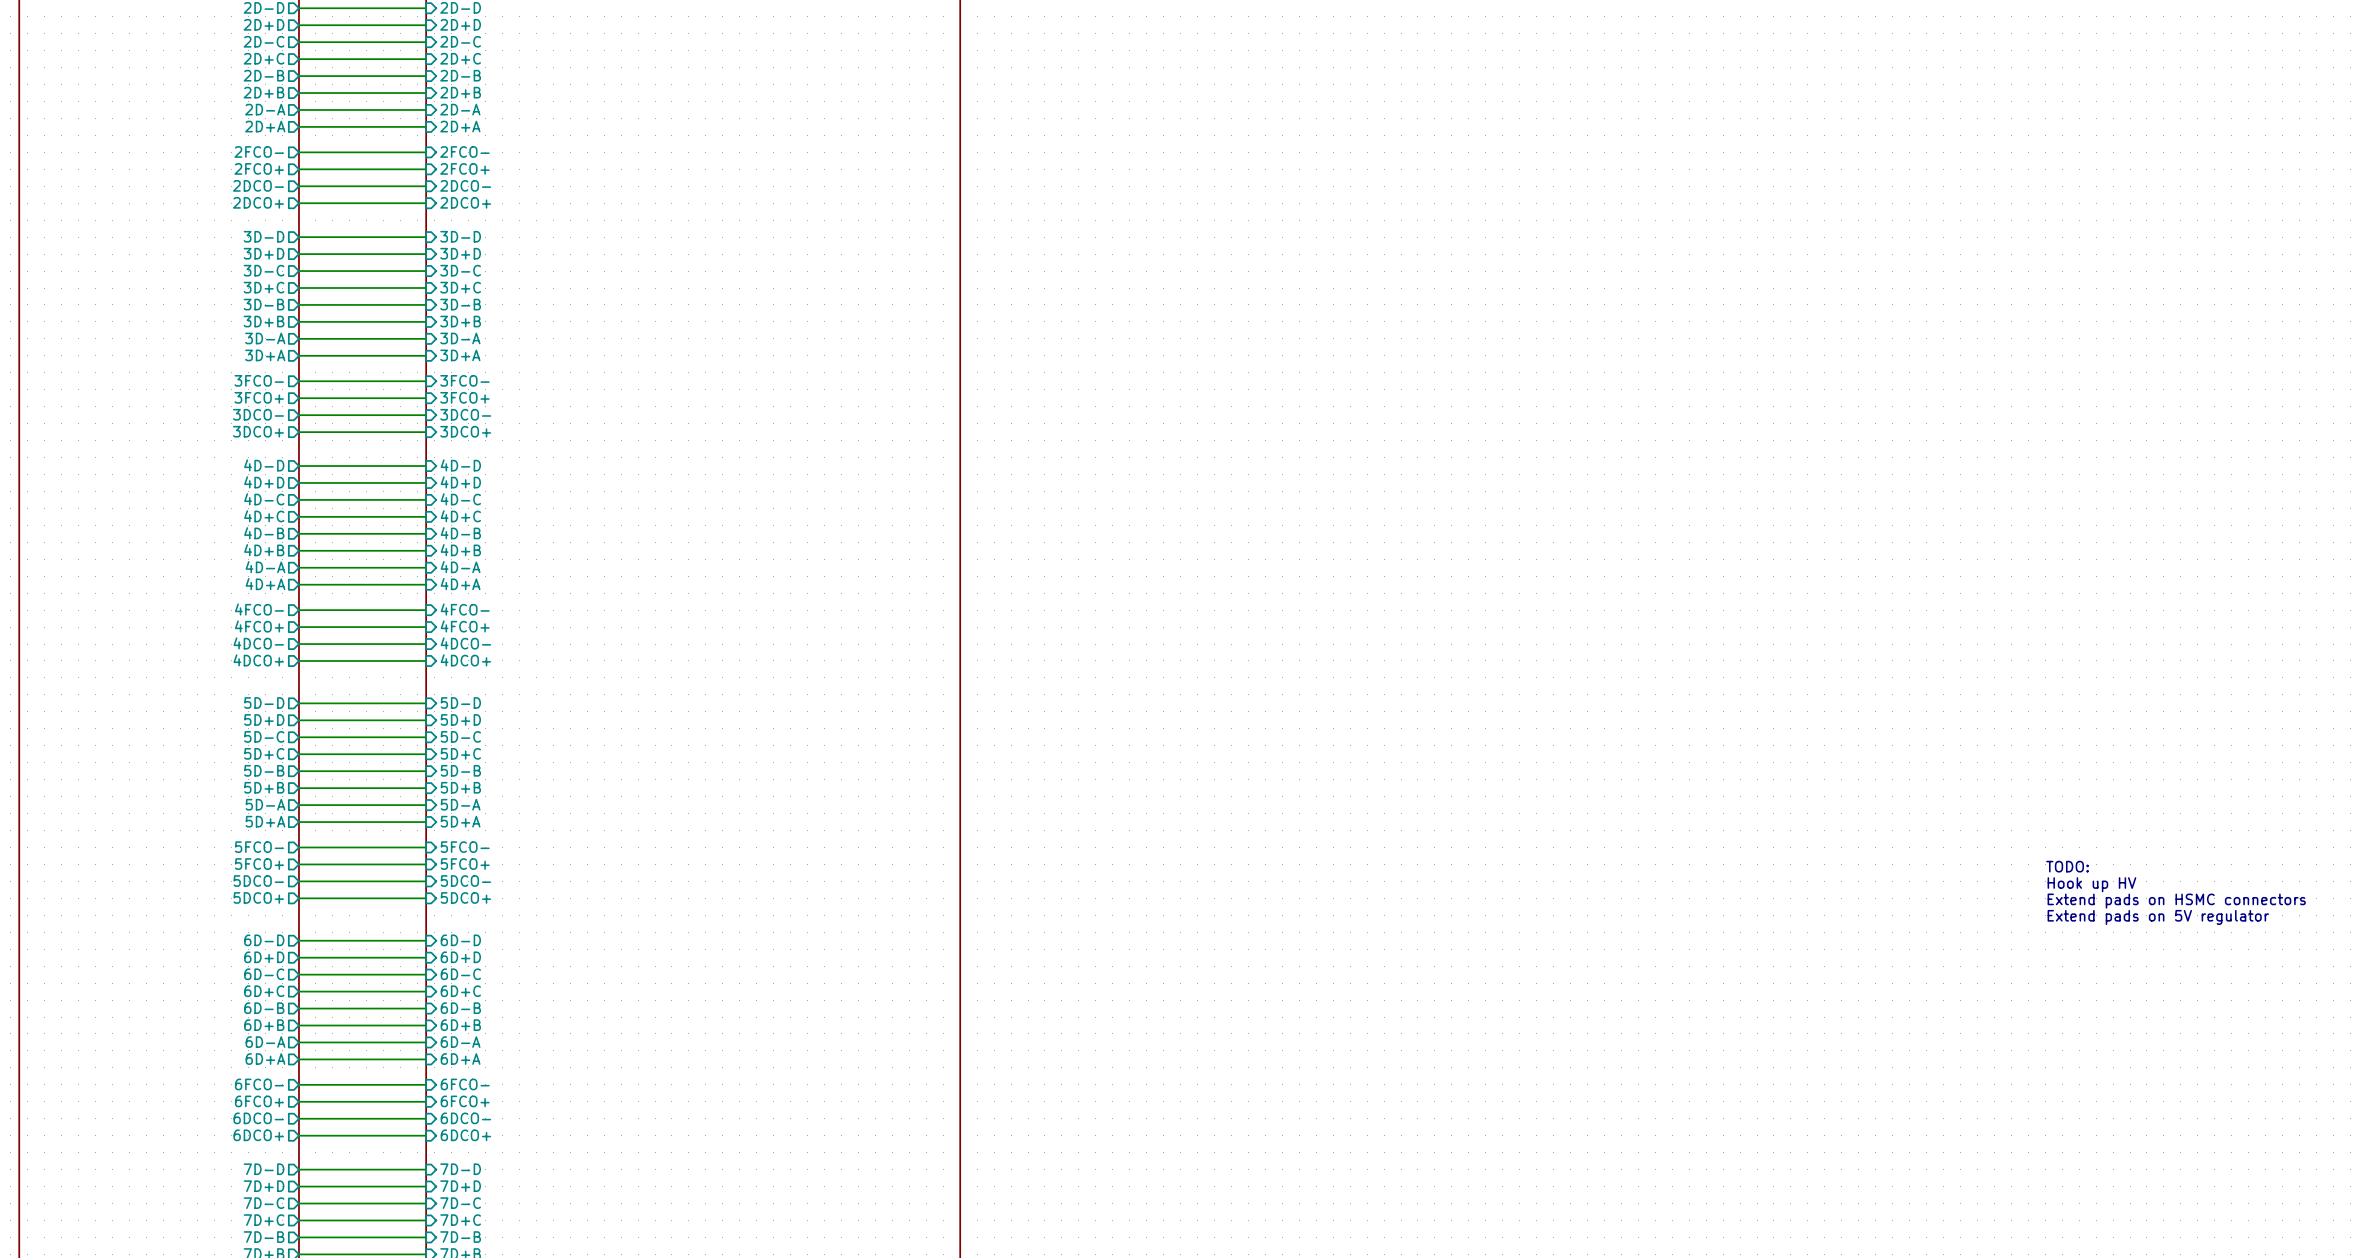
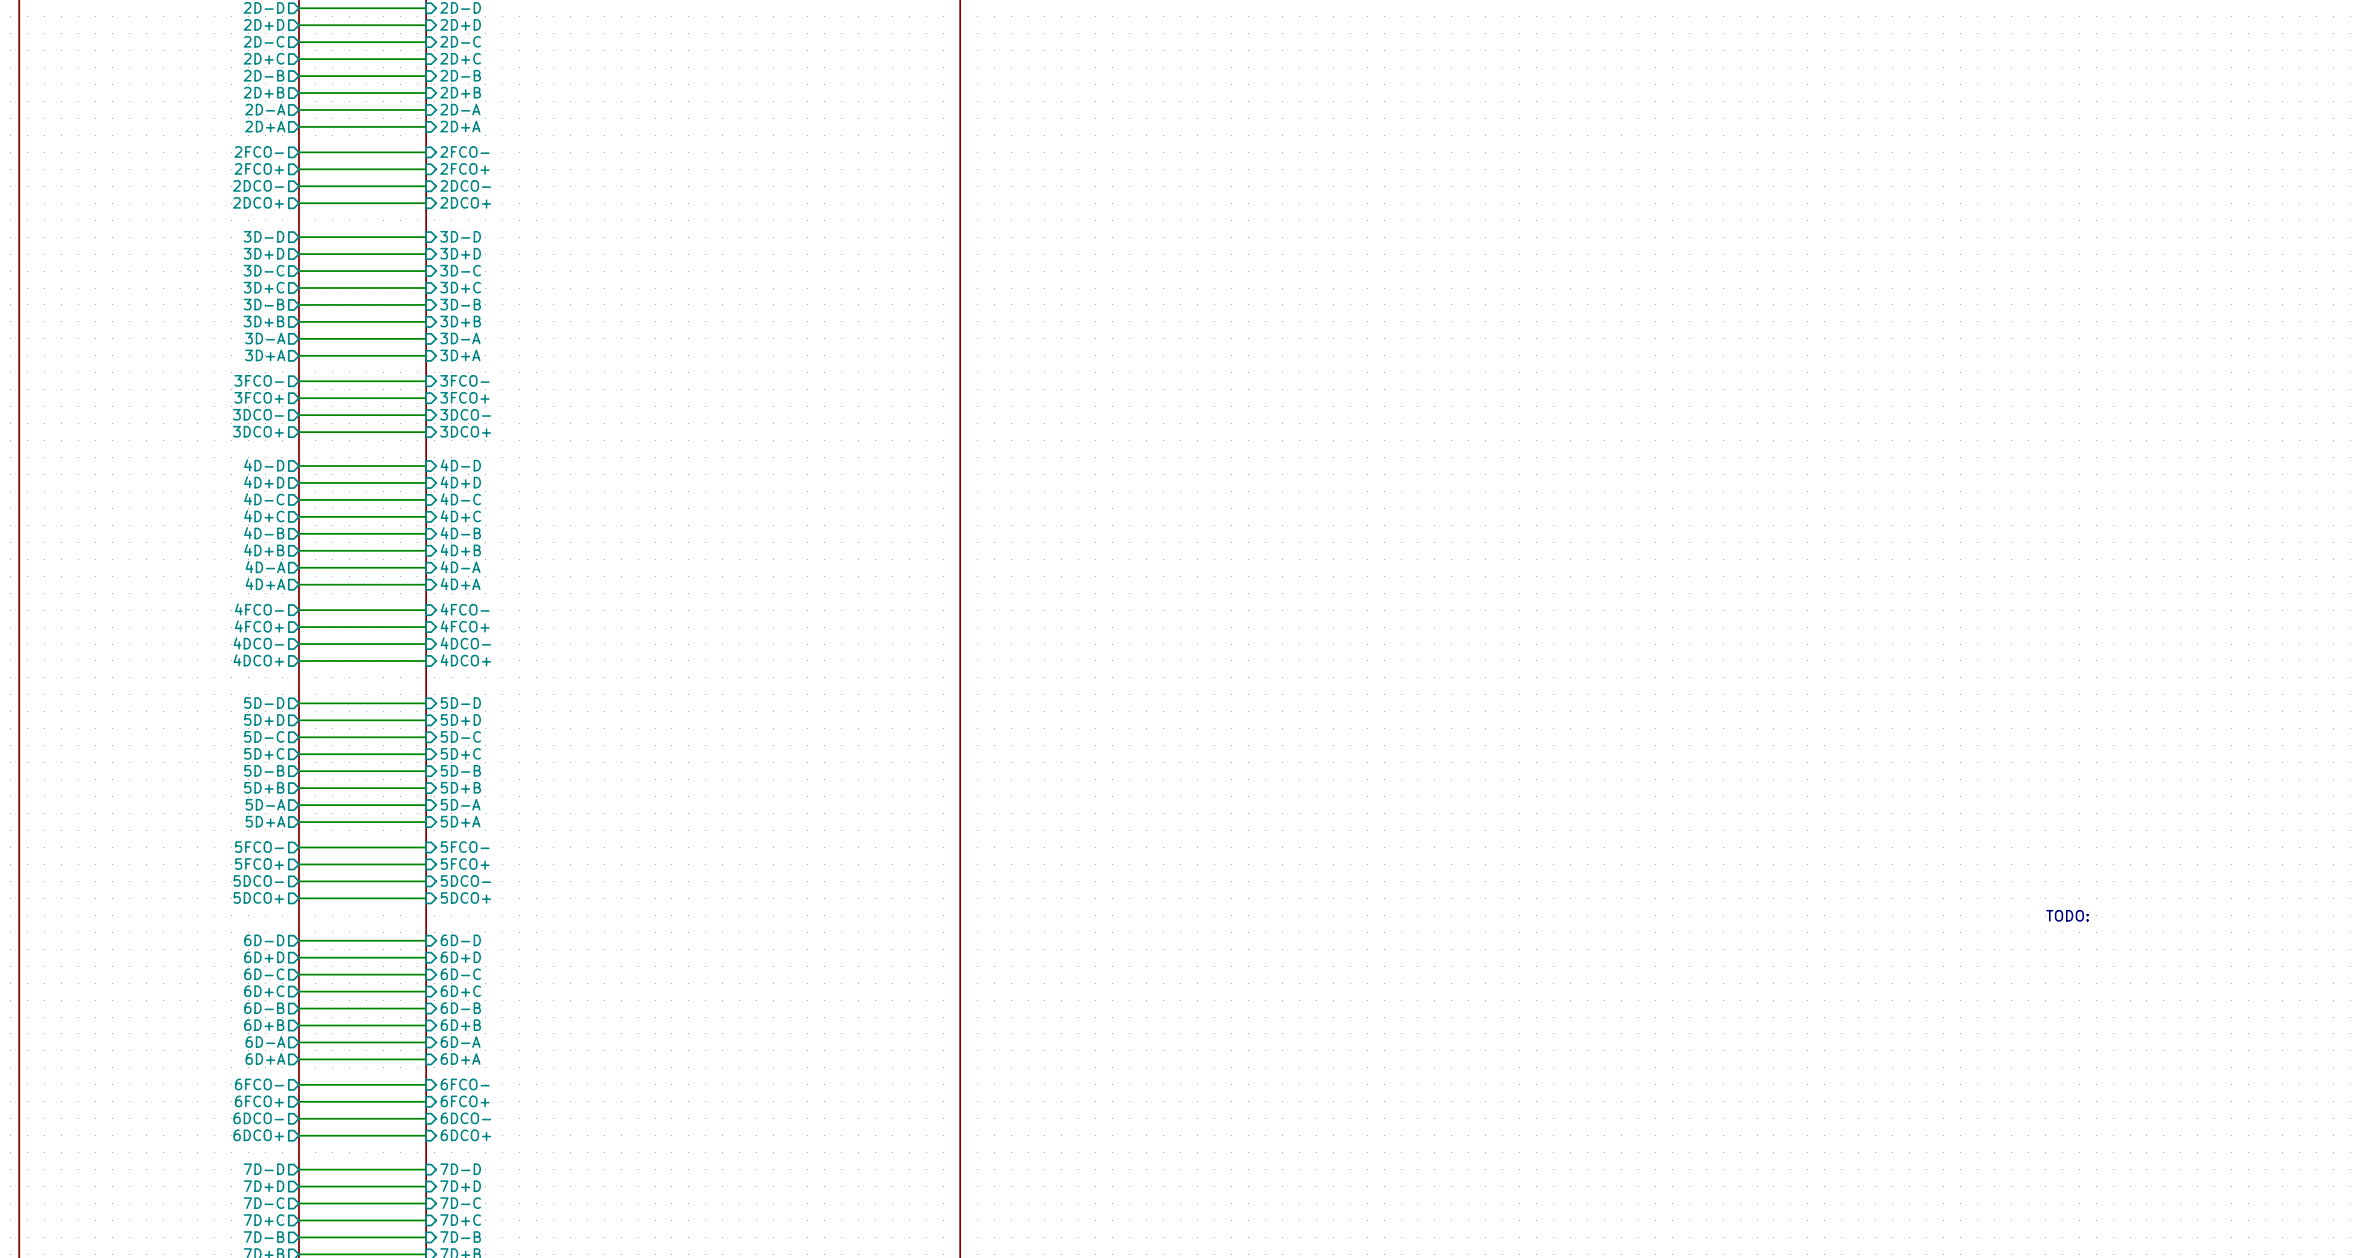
text: TODO: (2067, 866) -> none
text: Hook up HV (2091, 884) -> none
text: Extend pads on HSMC connectors (2176, 901) -> none
text: Extend pads on 5V regulator (2158, 917) -> TODO: (2067, 915)

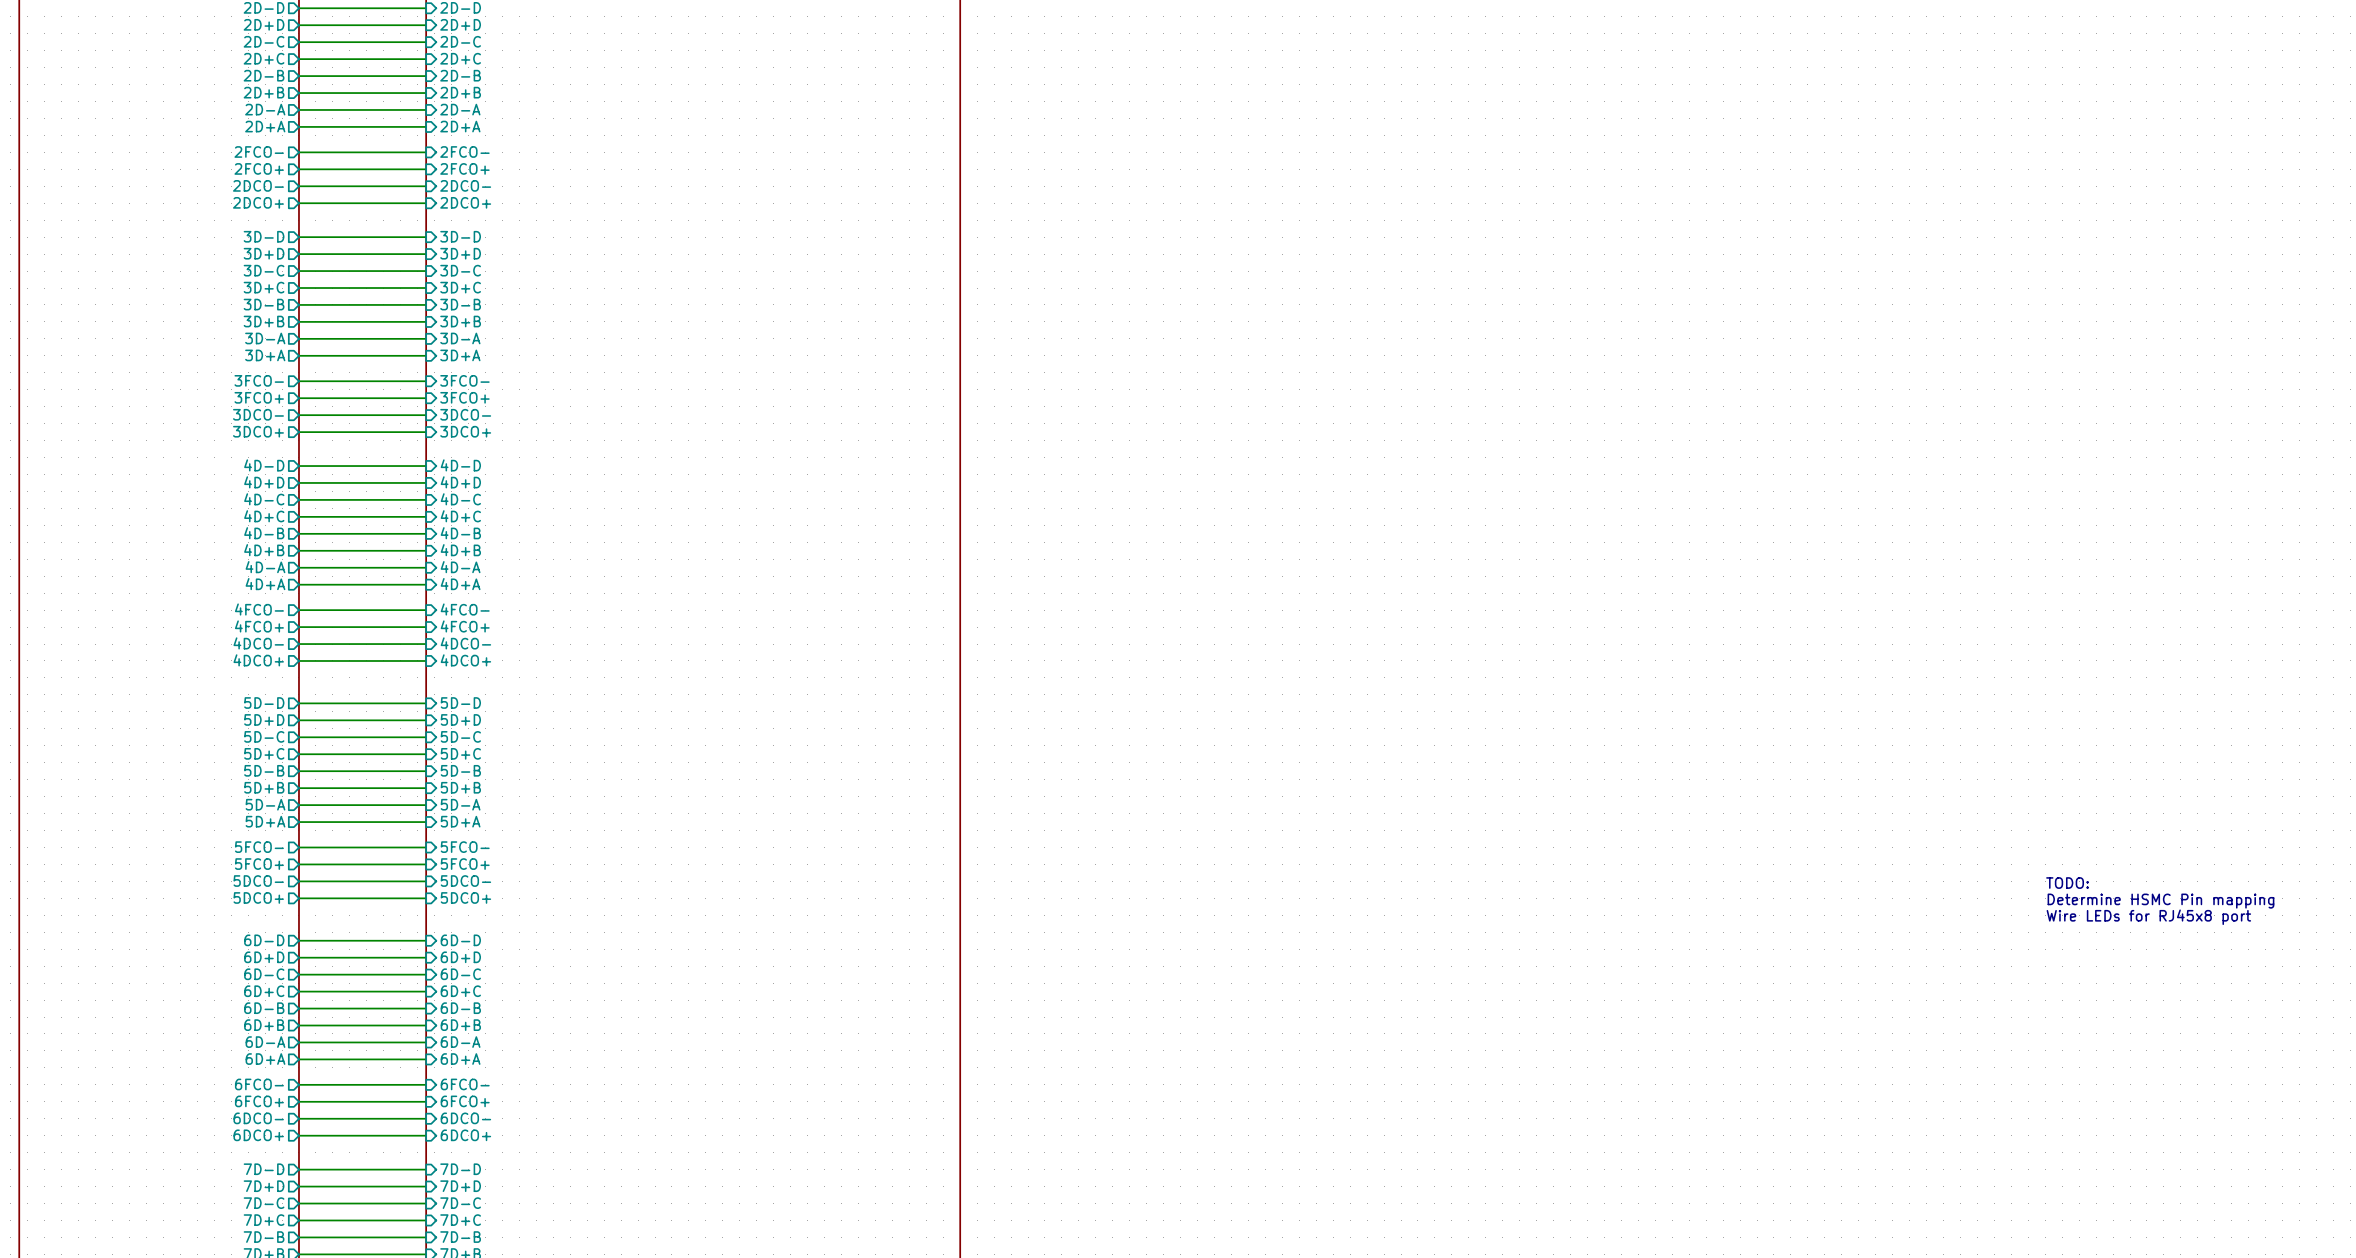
text: none -> TODO: (2067, 883)
text: none -> Determine HSMC Pin mapping (2160, 901)
text: TODO: (2067, 915) -> Wire LEDs for RJ45x8 port (2148, 917)

